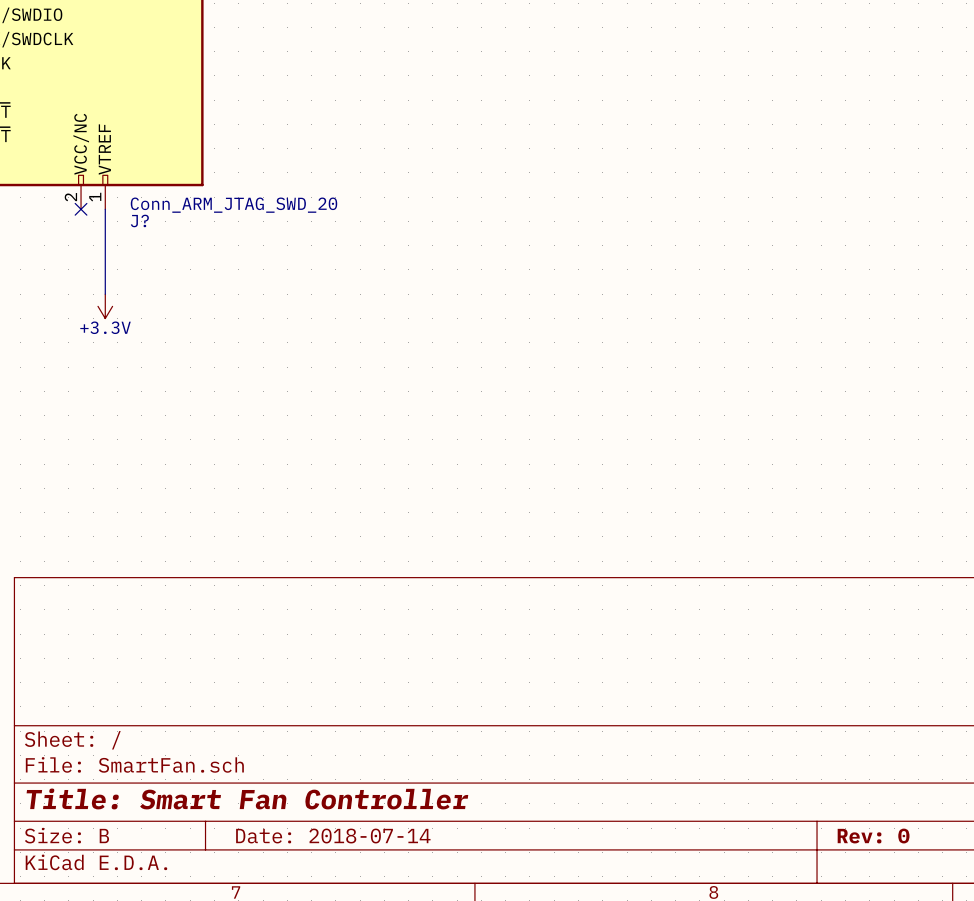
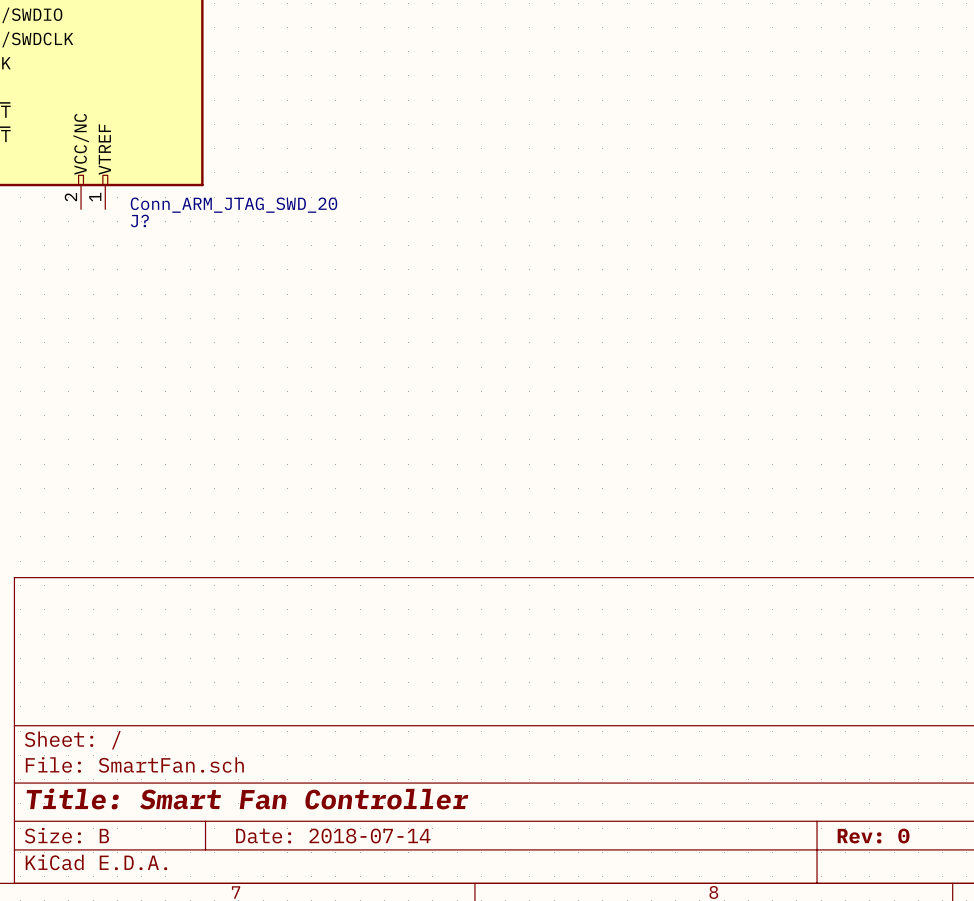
no-connect mark: (81, 209) -> none
wire: (105, 209) (105, 294) -> none
power symbol: +3.3V (105, 306) -> none

